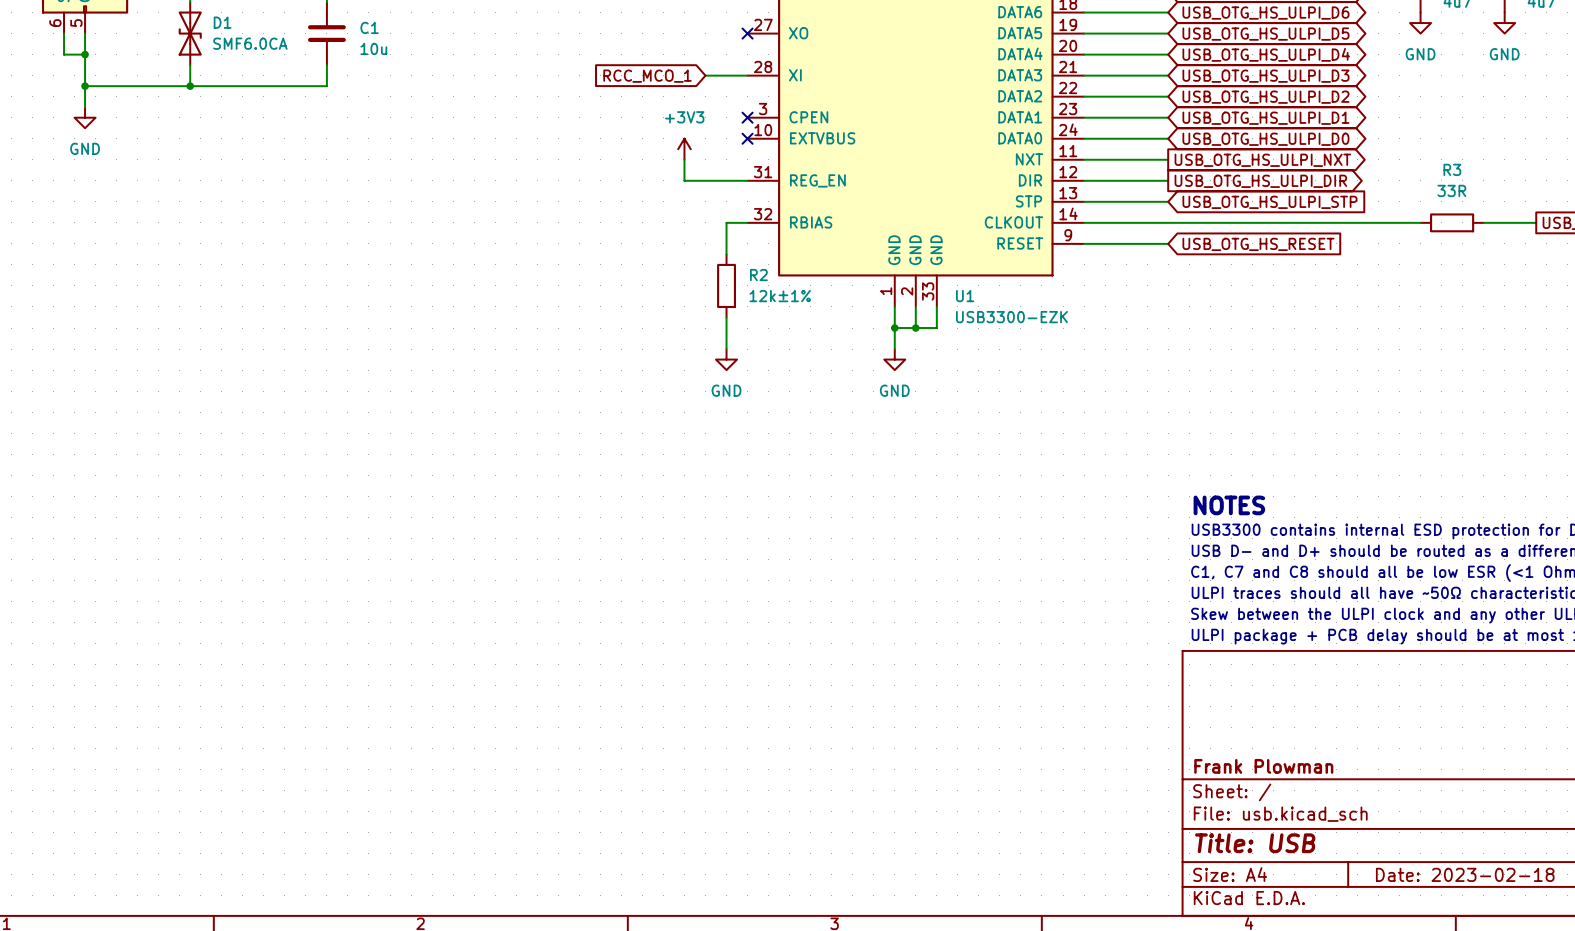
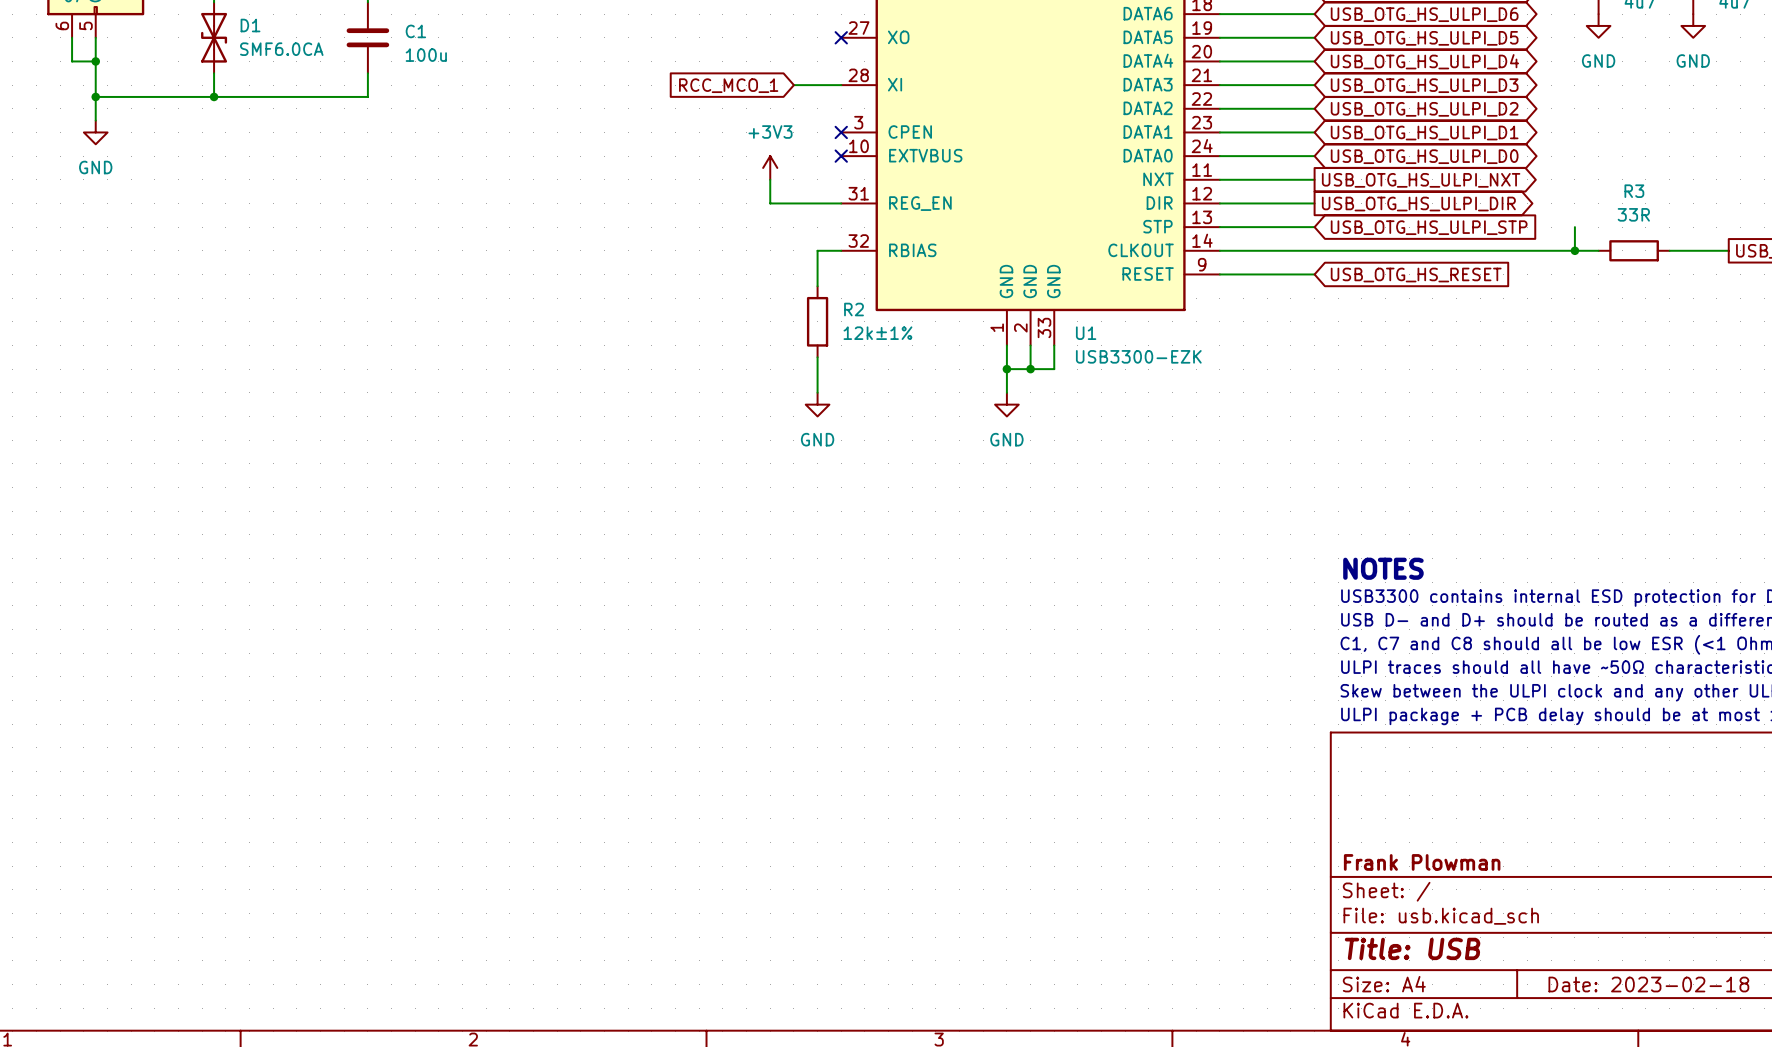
C1 value: 10u (373, 48) -> 100u (426, 55)
wire: none -> (1574, 227) (1574, 250)
junction: none -> (1574, 250)

